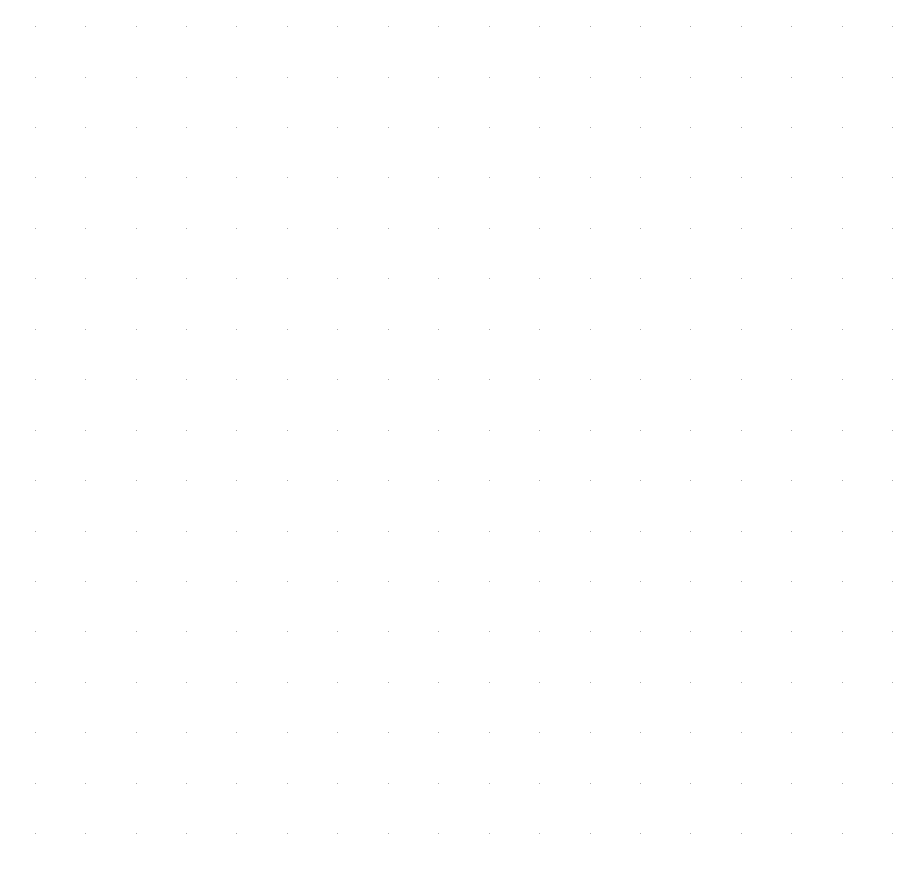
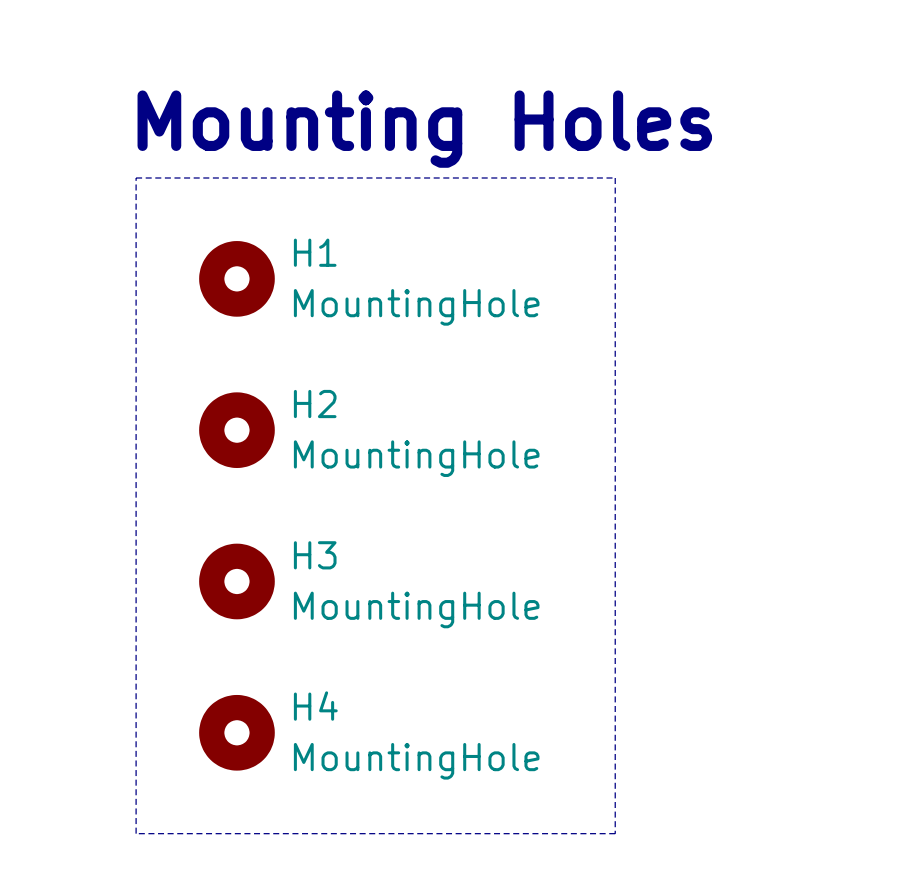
text: none -> Mounting Holes (424, 129)
line: none -> (136, 177) (615, 177) (615, 833) (136, 833) (136, 177)
H1: none -> MountingHole (236, 278)
H2: none -> MountingHole (236, 430)
H3: none -> MountingHole (236, 581)
H4: none -> MountingHole (236, 732)

